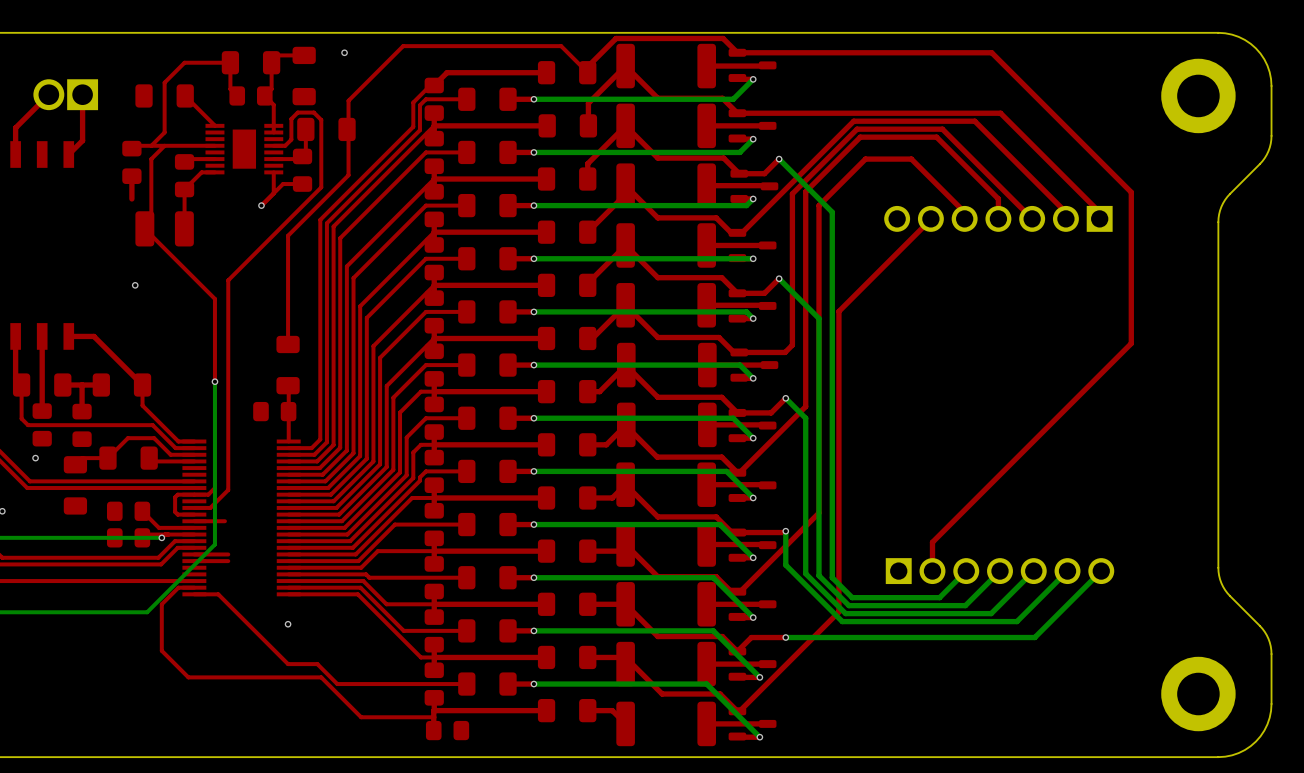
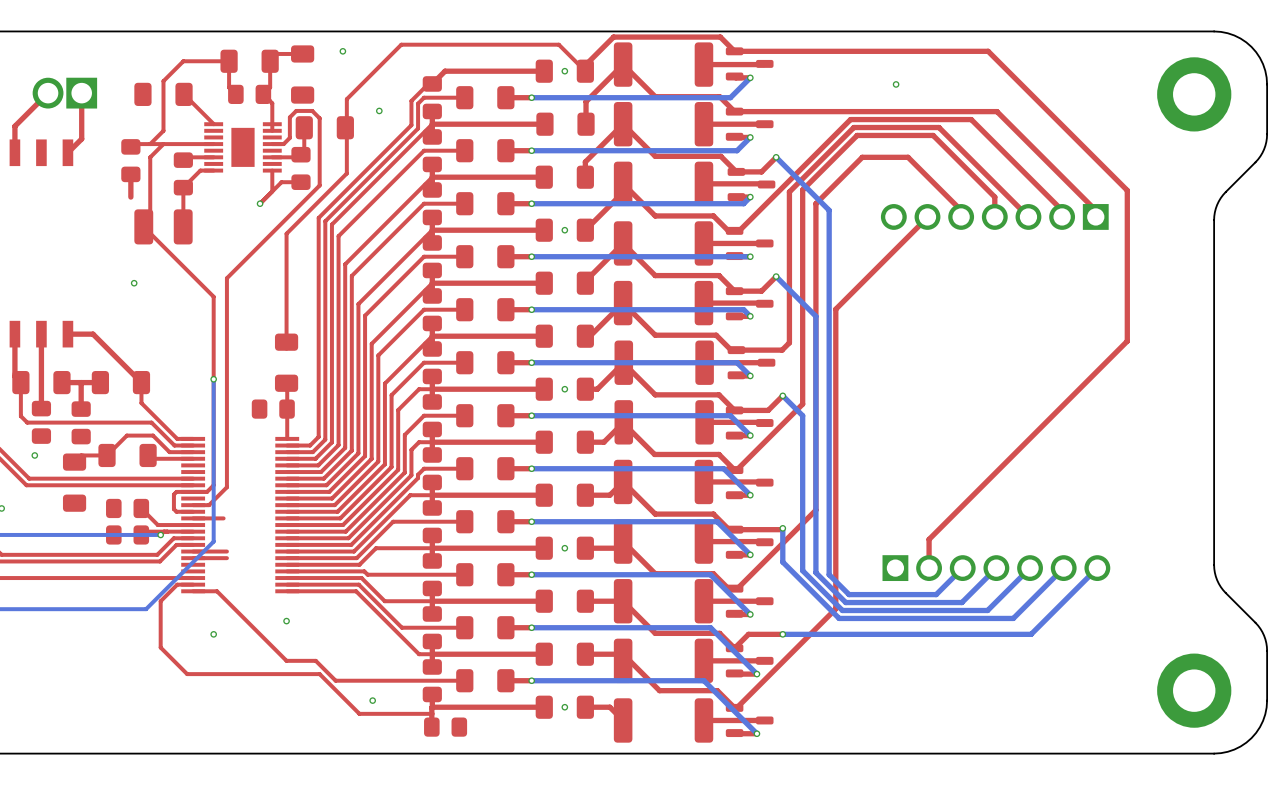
via: none -> (564, 71)
via: none -> (896, 84)
via: none -> (379, 110)
via: none -> (564, 230)
via: none -> (564, 389)
via: none -> (564, 548)
via: none -> (213, 634)
via: none -> (372, 700)
via: none -> (564, 707)

